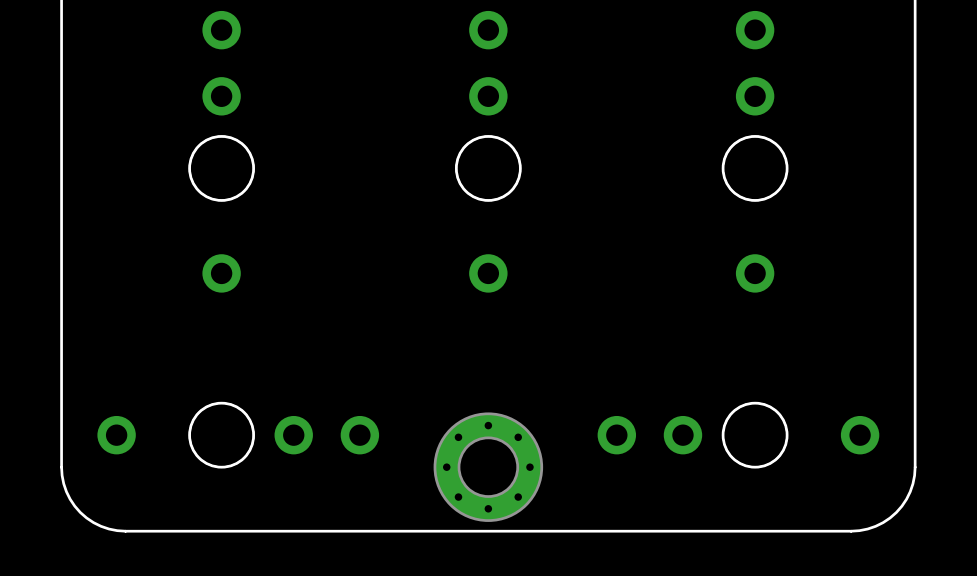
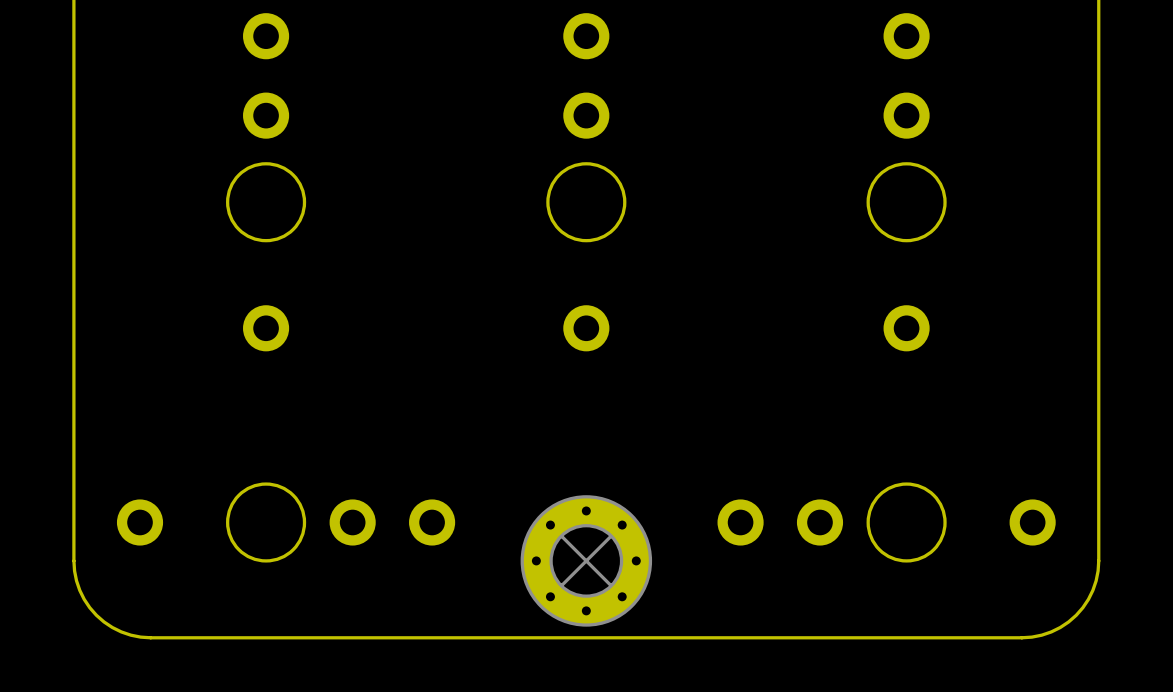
part footprint: [433, 412, 544, 522] -> [520, 495, 653, 627]

